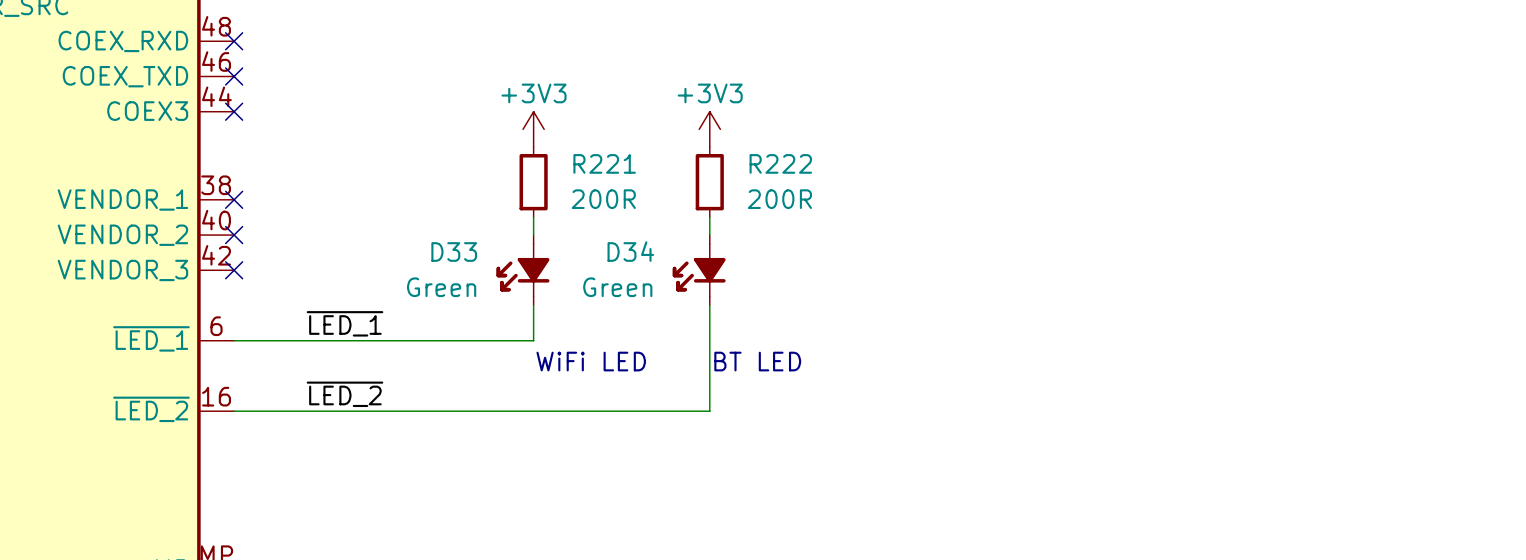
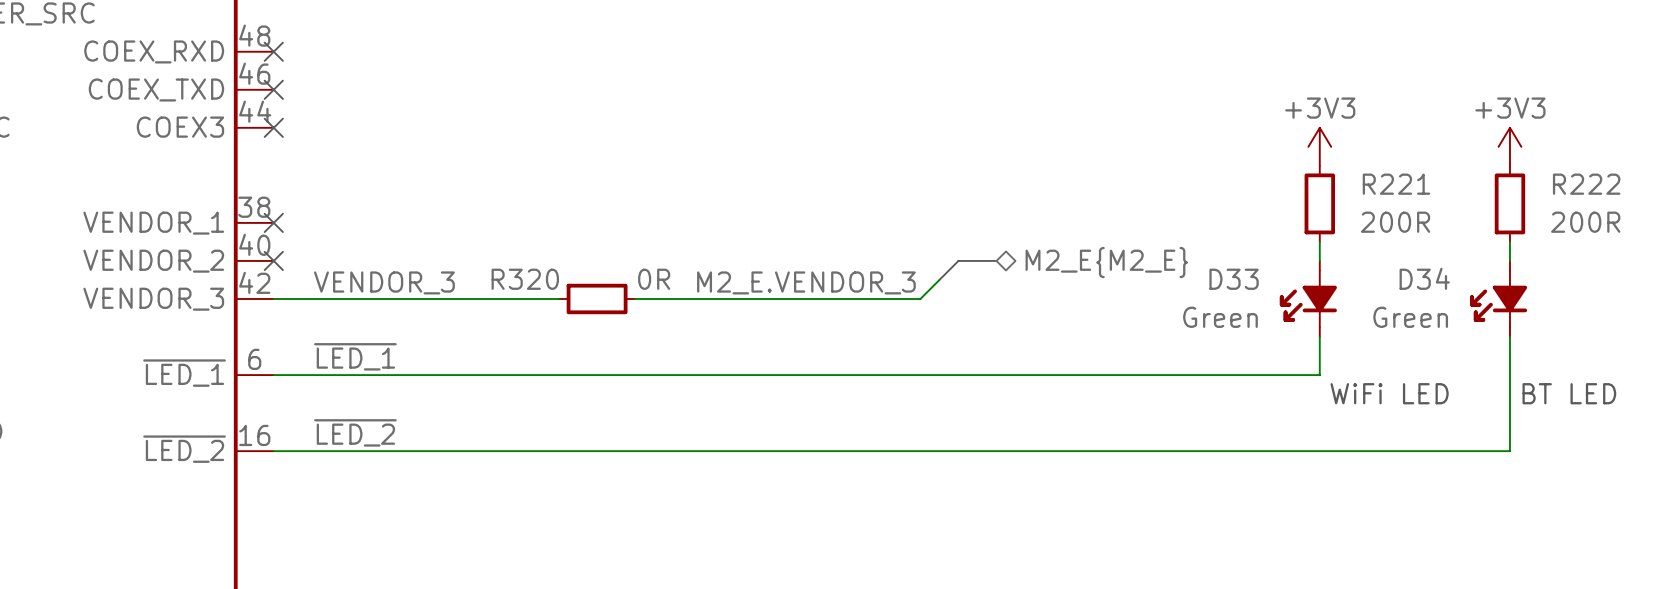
power symbol: +3V3 (533, 129) -> none
power symbol: +3V3 (709, 129) -> none
power symbol: none -> +3V3 (1319, 146)
power symbol: none -> +3V3 (1509, 146)
R221 position: (533, 182) -> (1319, 203)
R222 position: (709, 182) -> (1509, 203)
wire: (533, 217) (533, 235) -> none
wire: (709, 217) (709, 235) -> none
wire: none -> (1319, 241) (1319, 260)
wire: none -> (1509, 241) (1509, 260)
bus: none -> (996, 260) (958, 260) (939, 279)
hierarchical label: none -> M2_E{M2_E} (1106, 262)
wire: none -> (939, 279) (920, 299) (635, 299)
label: none -> VENDOR_3 (384, 282)
label: none -> M2_E.VENDOR_3 (806, 282)
wire: none -> (273, 299) (559, 299)
no-connect mark: (234, 270) -> none
D33 position: (523, 270) -> (1308, 299)
R320: none -> (597, 299)
D34 position: (699, 270) -> (1498, 299)
wire: (533, 305) (533, 340) -> (1319, 337) (1319, 375) (597, 375)
wire: (709, 305) (709, 411) -> (1509, 337) (1509, 451) (787, 451)
label position: ~{LED_1} (345, 323) -> ~{LED_1} (355, 356)
text: none -> WiFi LED (1389, 393)
text: none -> BT LED (1569, 393)
text: WiFi LED (591, 361) -> none
text: BT LED (757, 361) -> none
label position: ~{LED_2} (345, 394) -> ~{LED_2} (355, 432)

